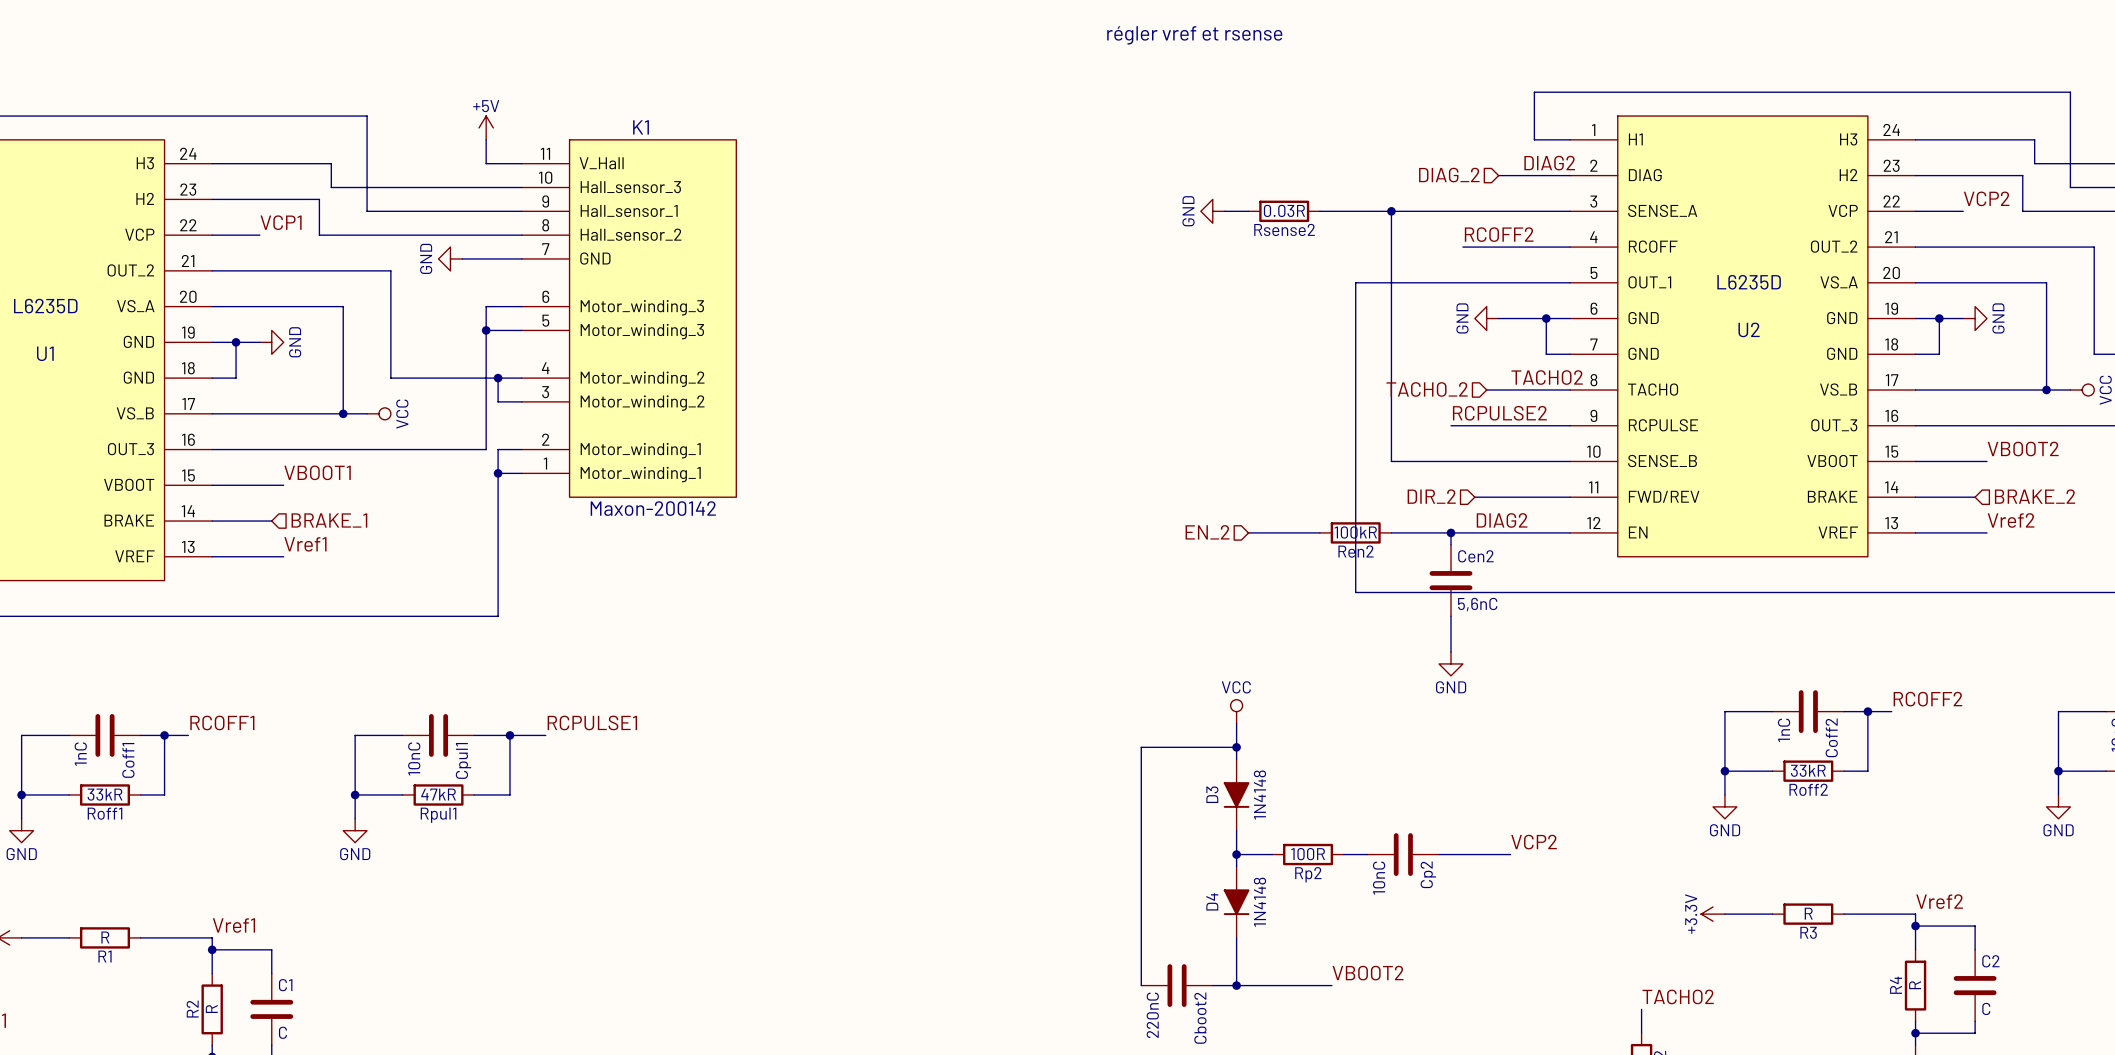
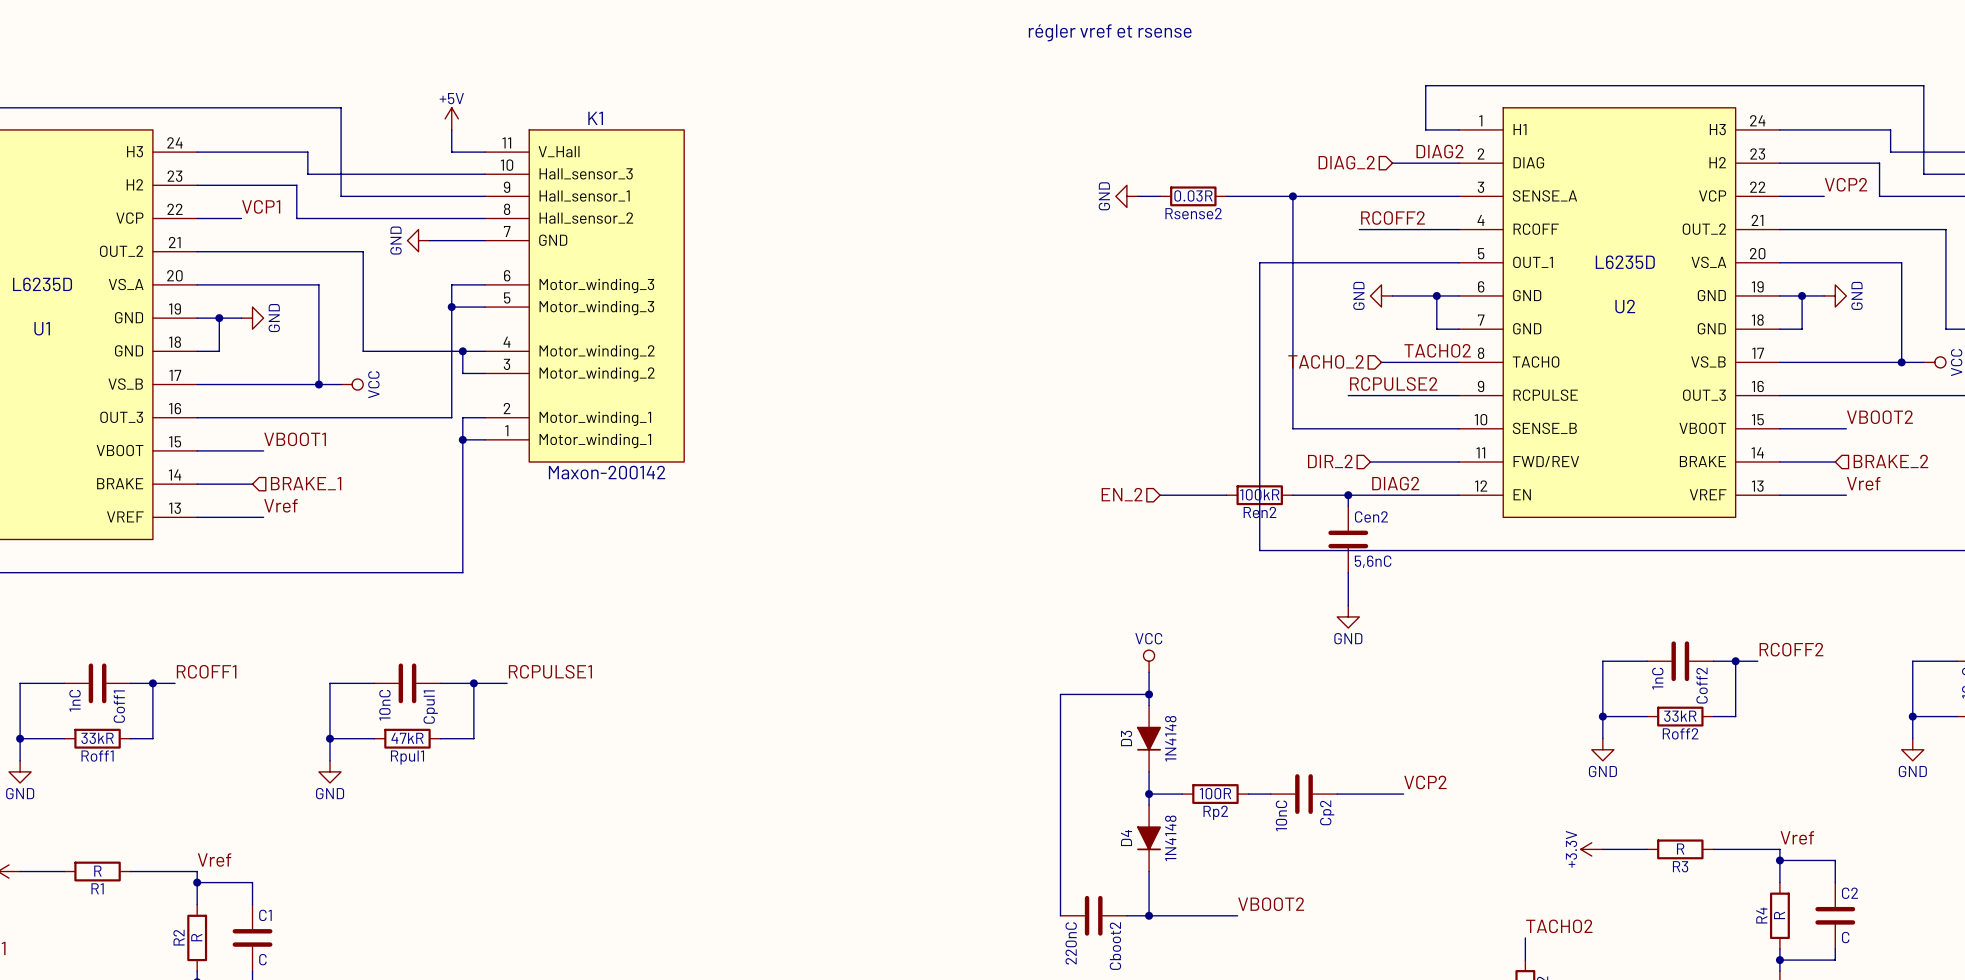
label: Vref2 (2011, 520) -> Vref (1863, 483)
label: Vref1 (305, 544) -> Vref (280, 505)
label: Vref2 (1939, 901) -> Vref (1797, 837)
label: Vref1 (233, 925) -> Vref (214, 860)

